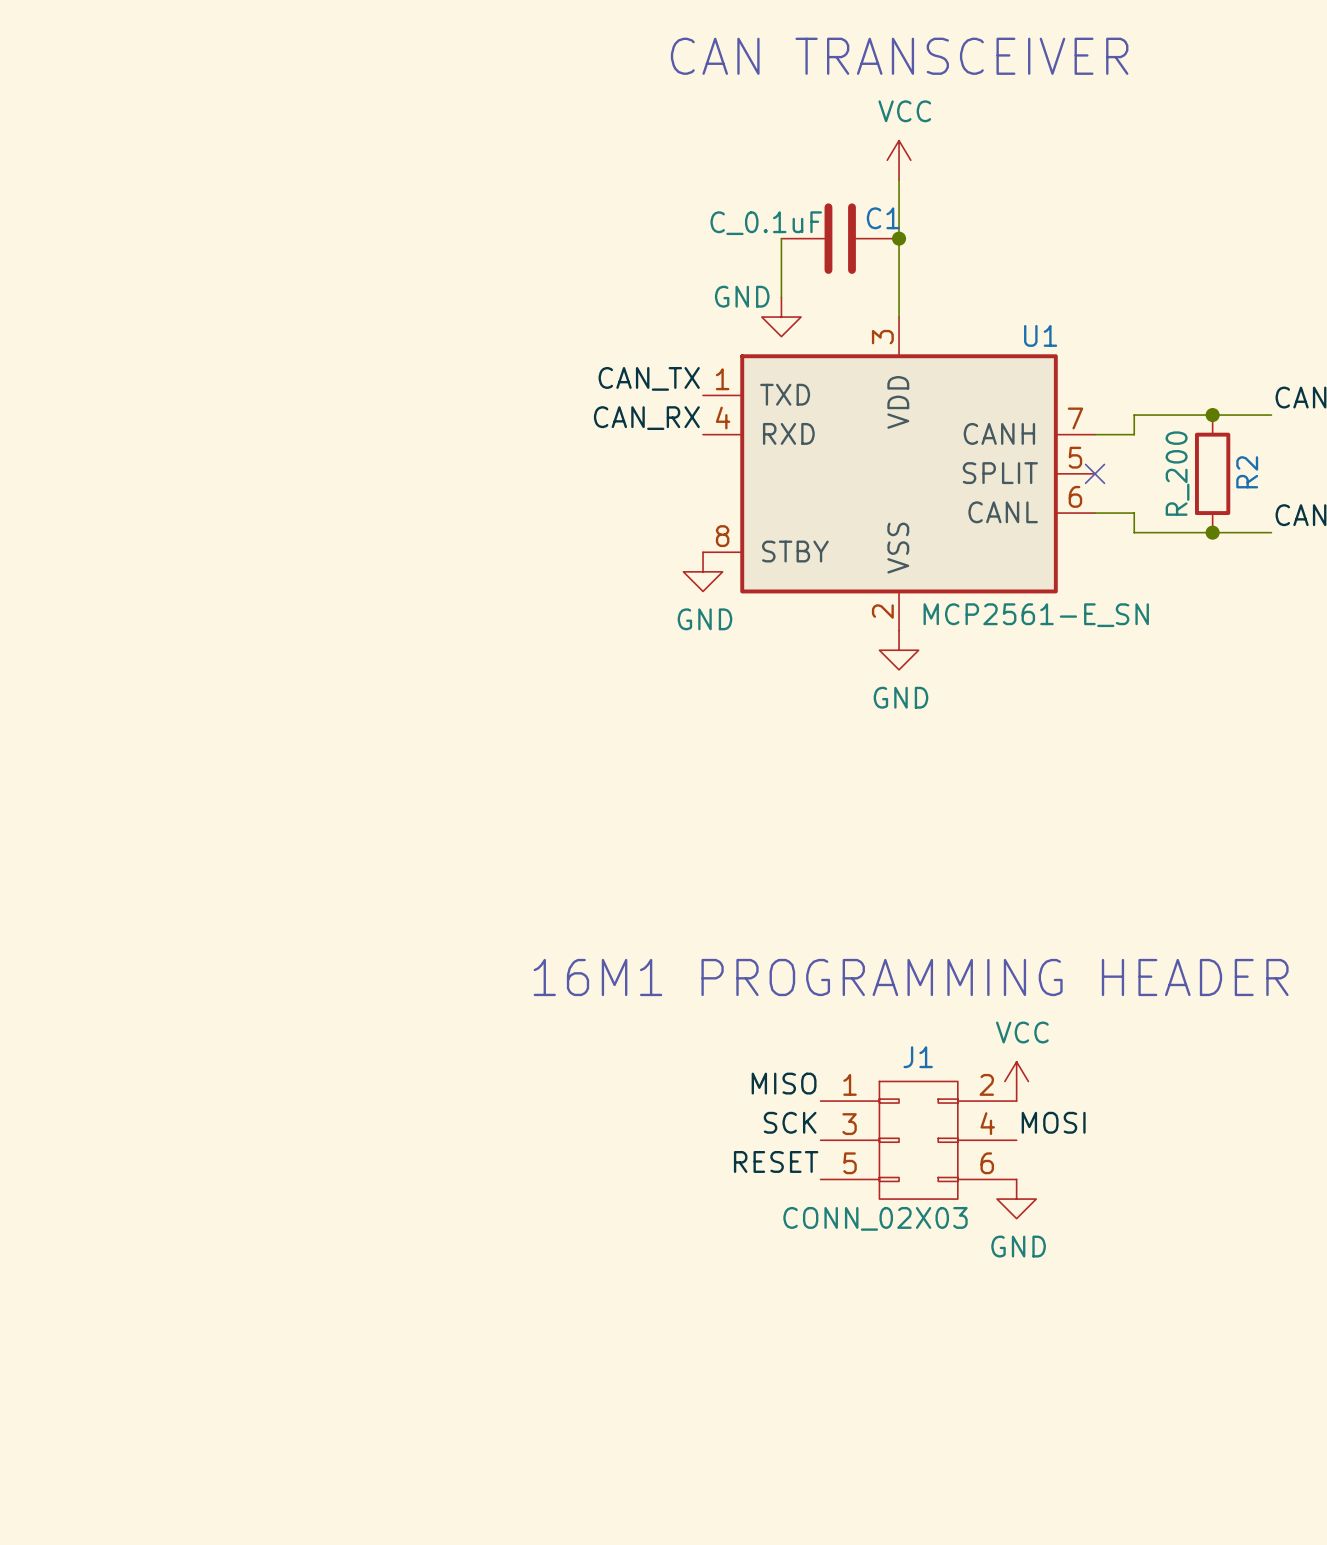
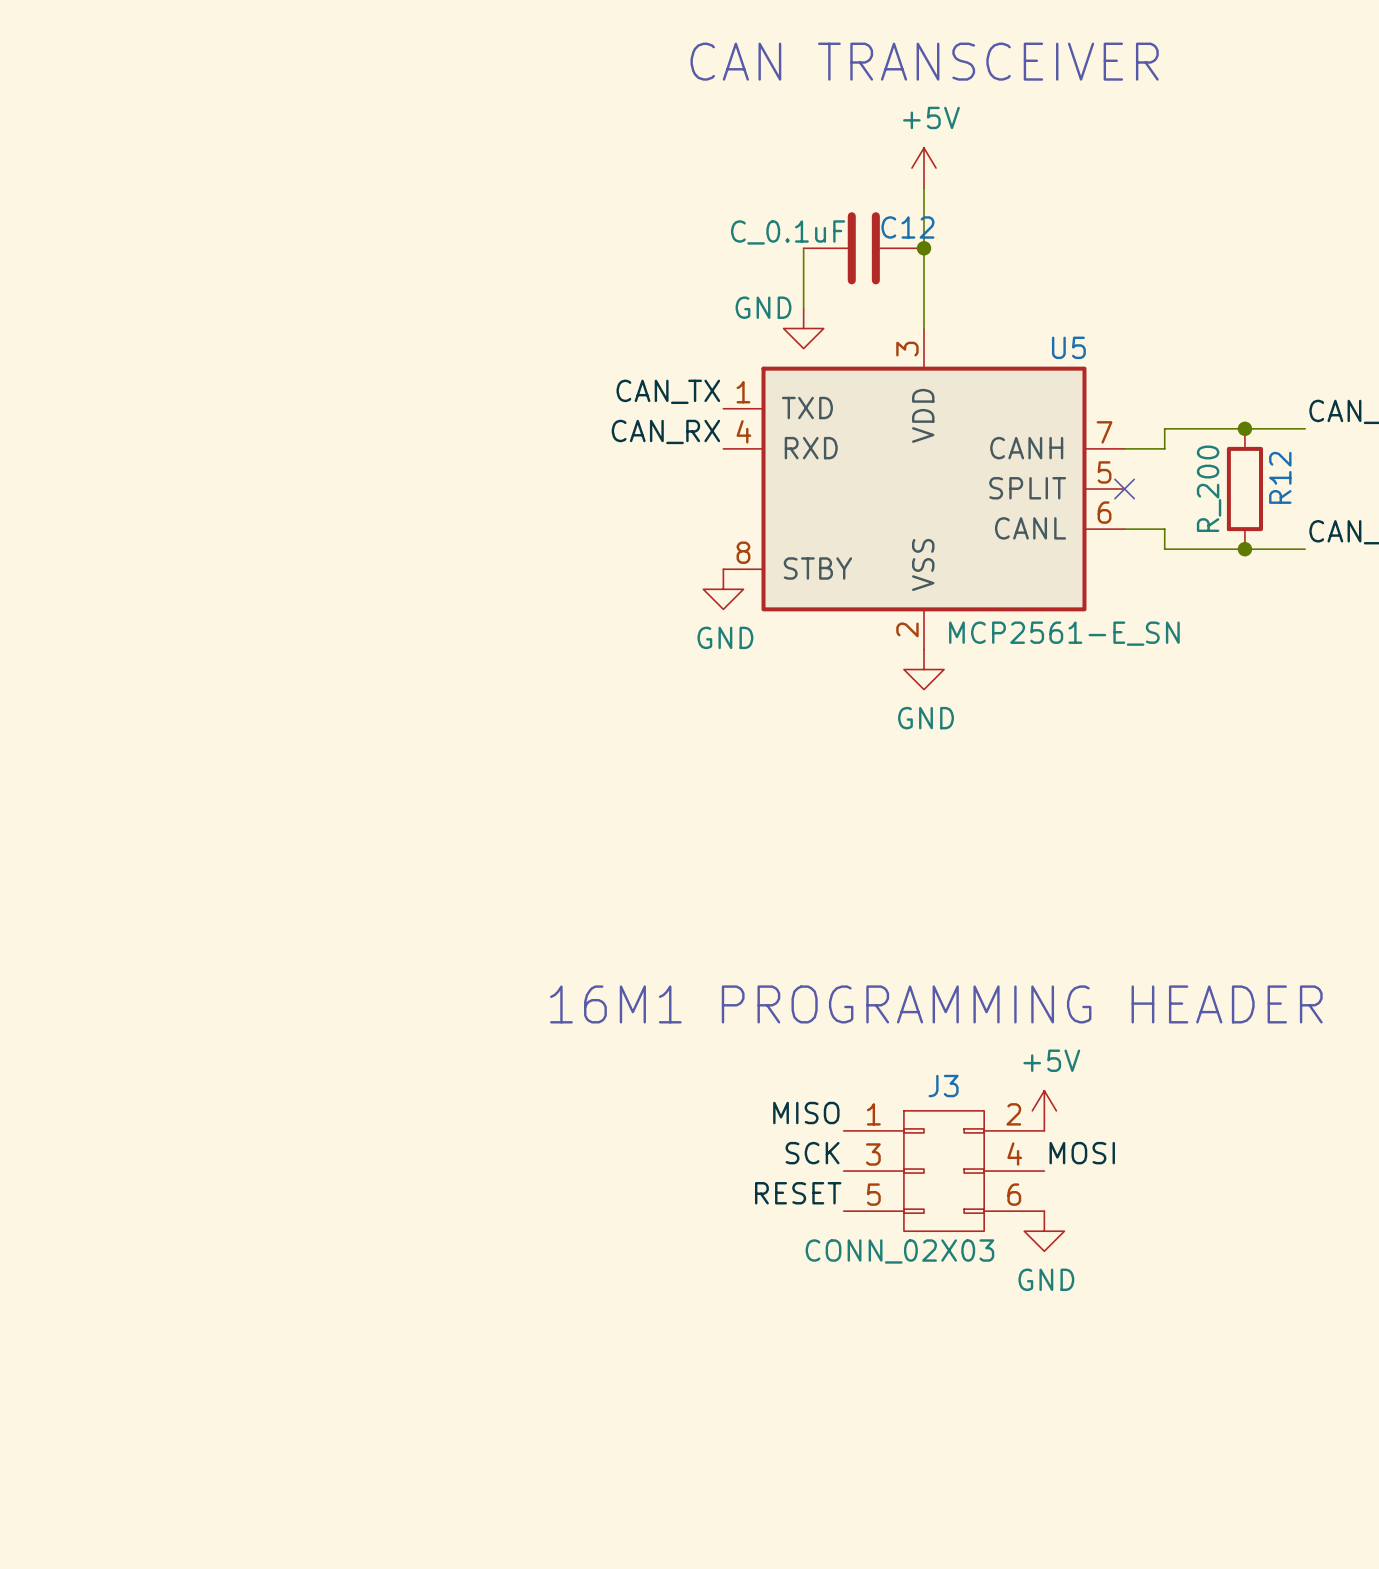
power symbol: VCC (899, 160) -> +5V (923, 168)
C1 name: C1 (883, 218) -> C12 (907, 227)
U1 name: U1 (1040, 335) -> U5 (1068, 347)
R2 name: R2 (1247, 472) -> R12 (1280, 477)
J1 name: J1 (918, 1057) -> J3 (943, 1086)
power symbol: VCC (1016, 1081) -> +5V (1044, 1110)

